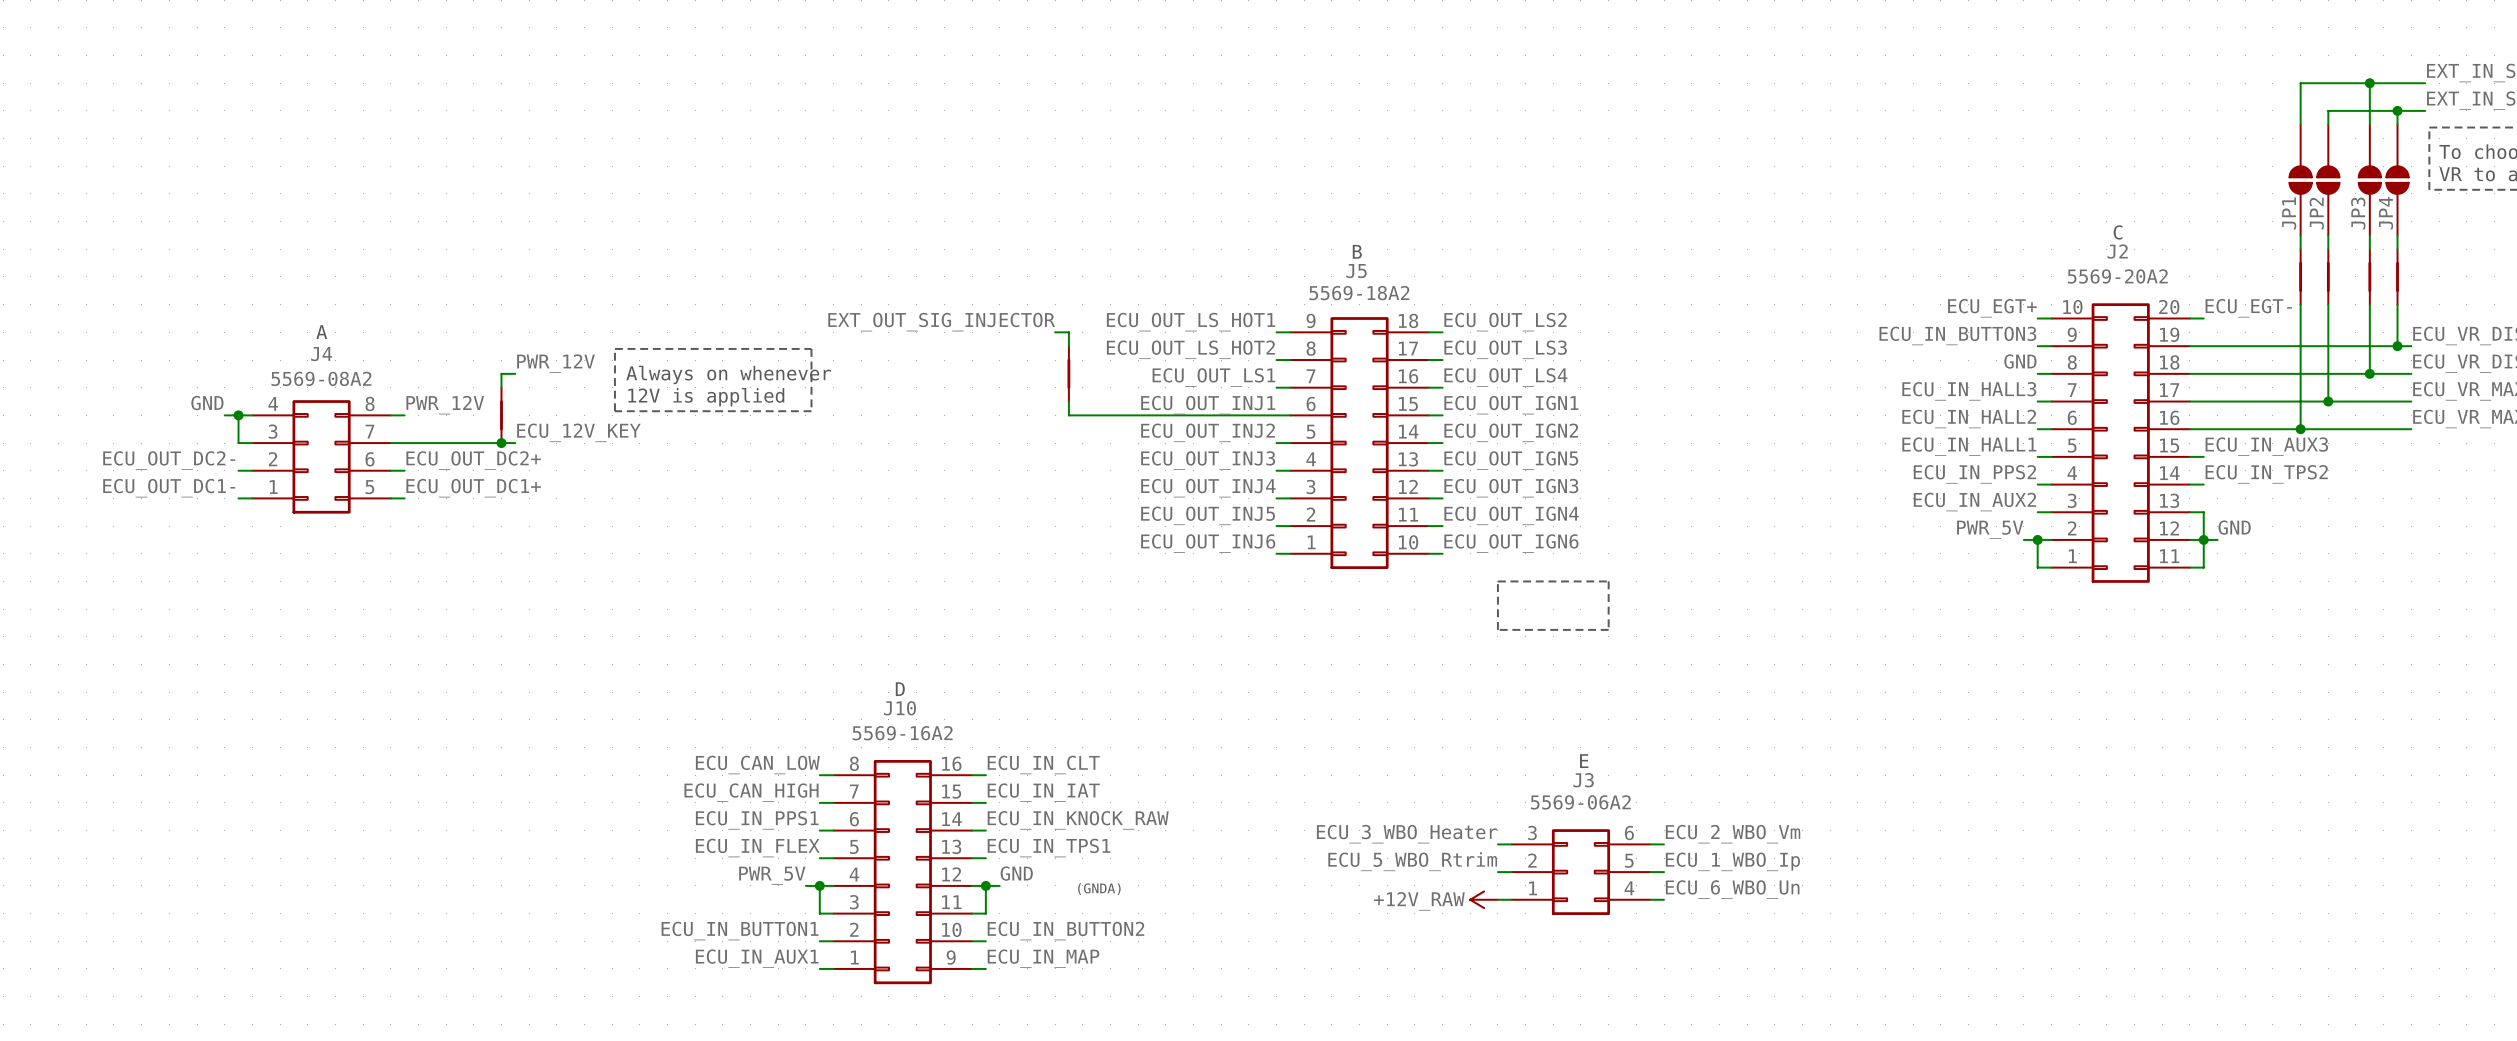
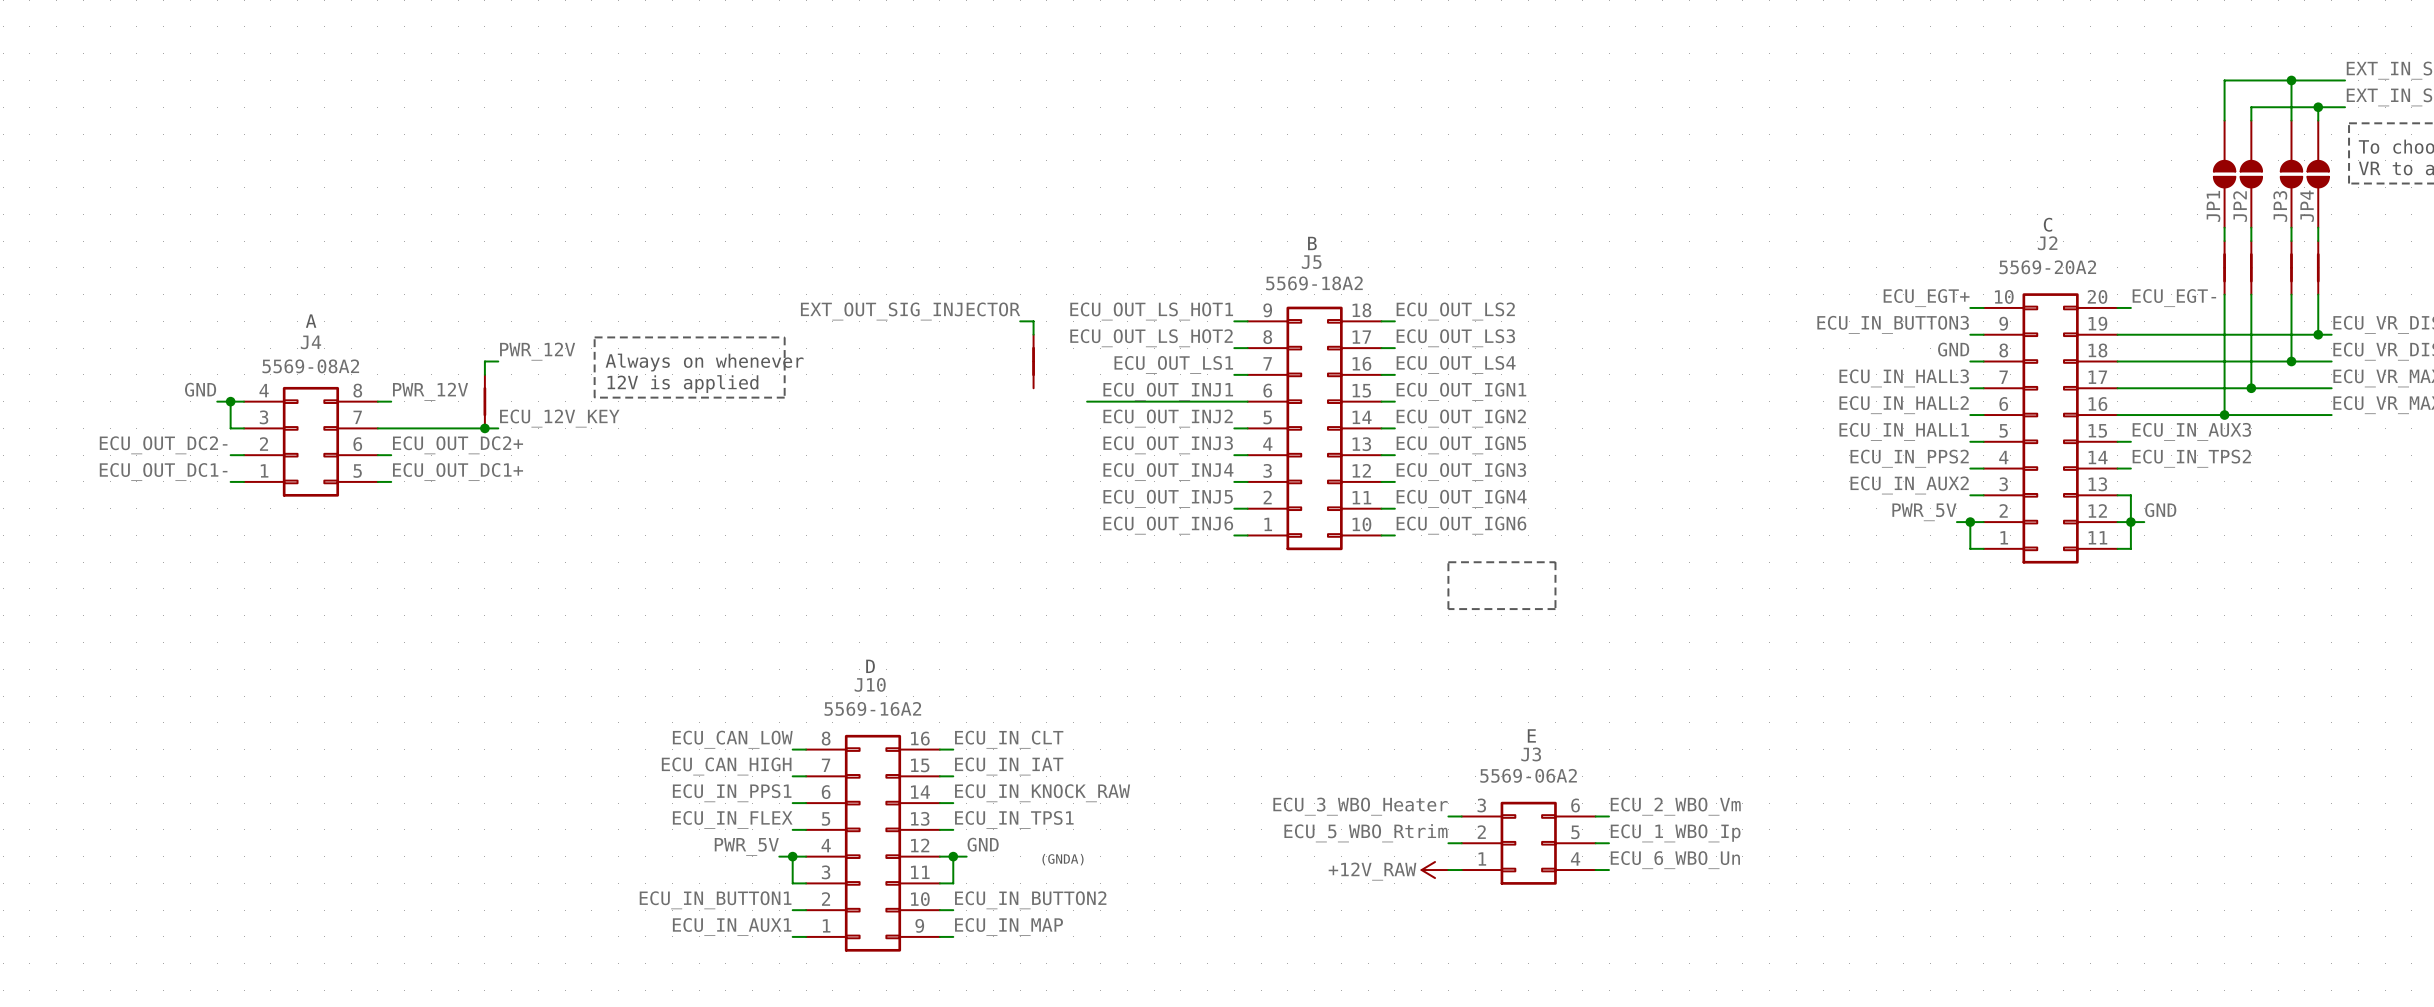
wire: (1068, 401) (1068, 415) (1124, 415) -> none

